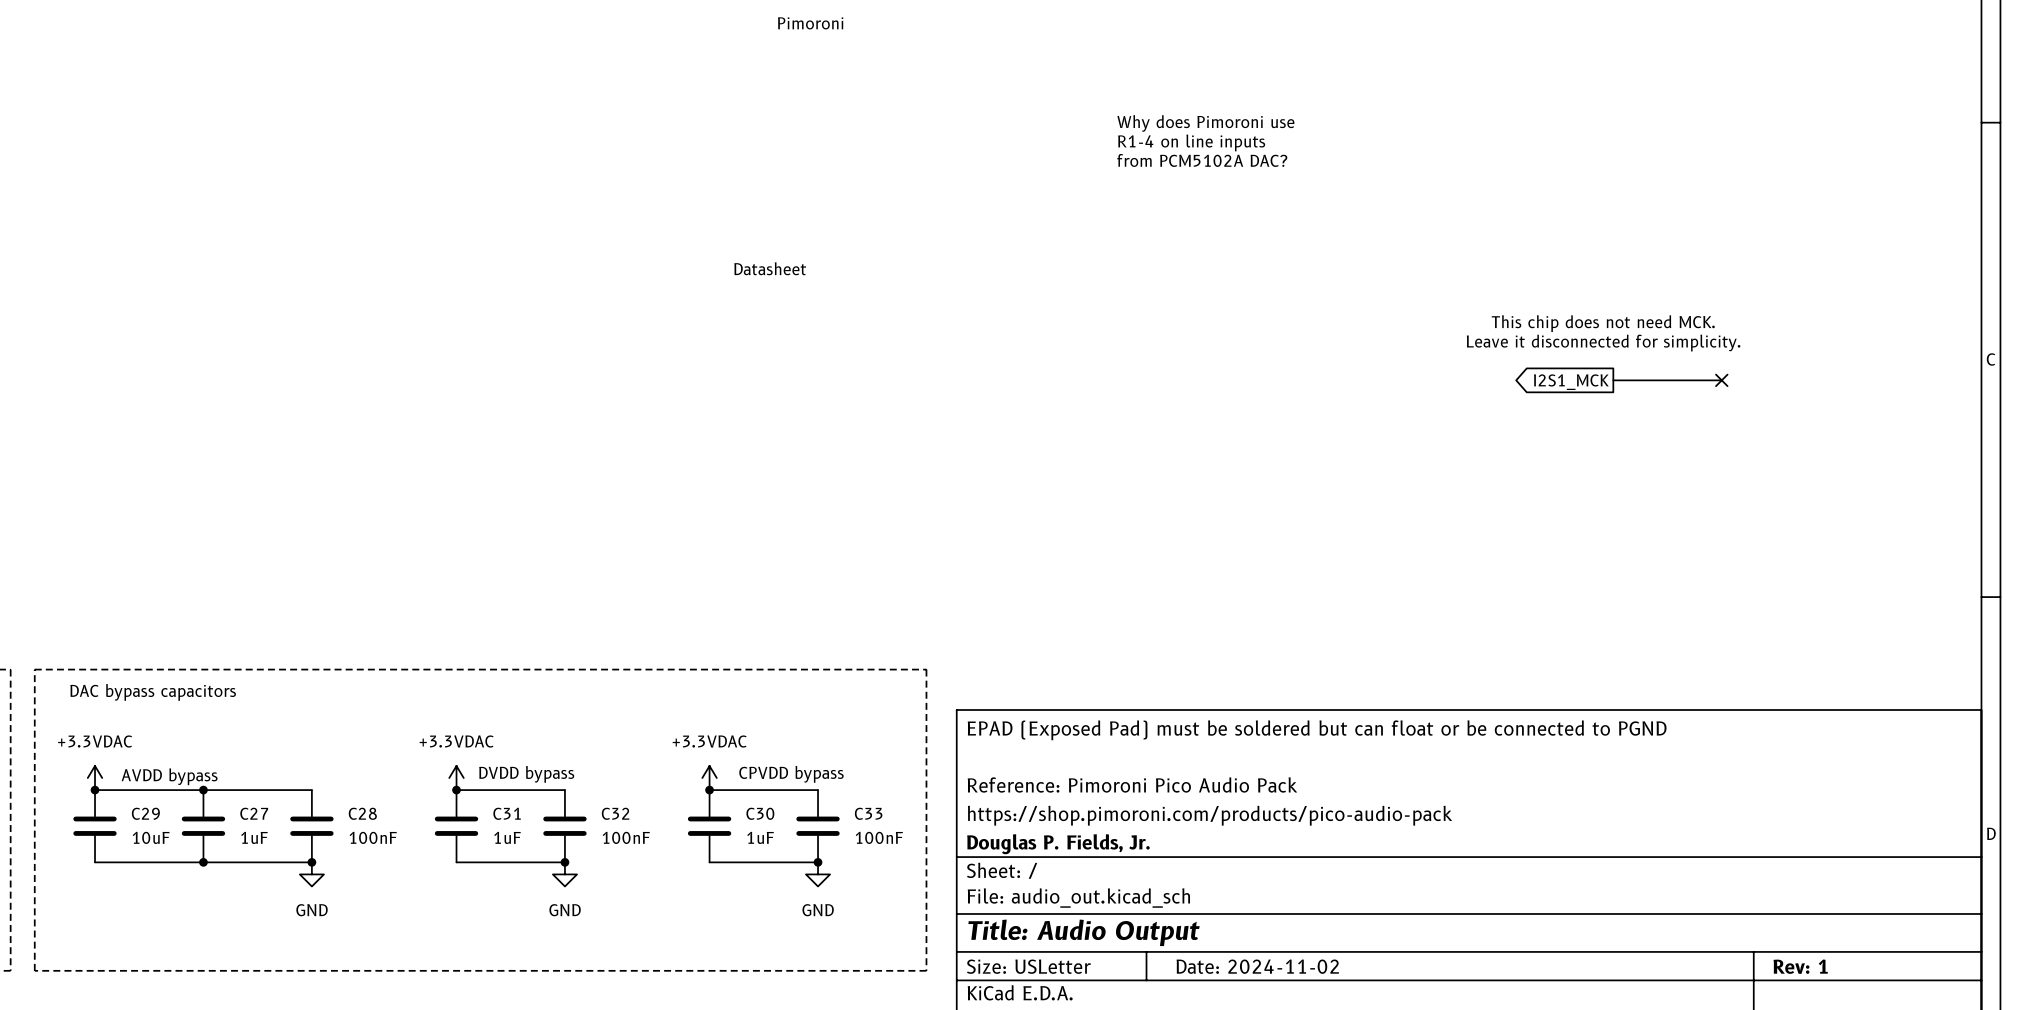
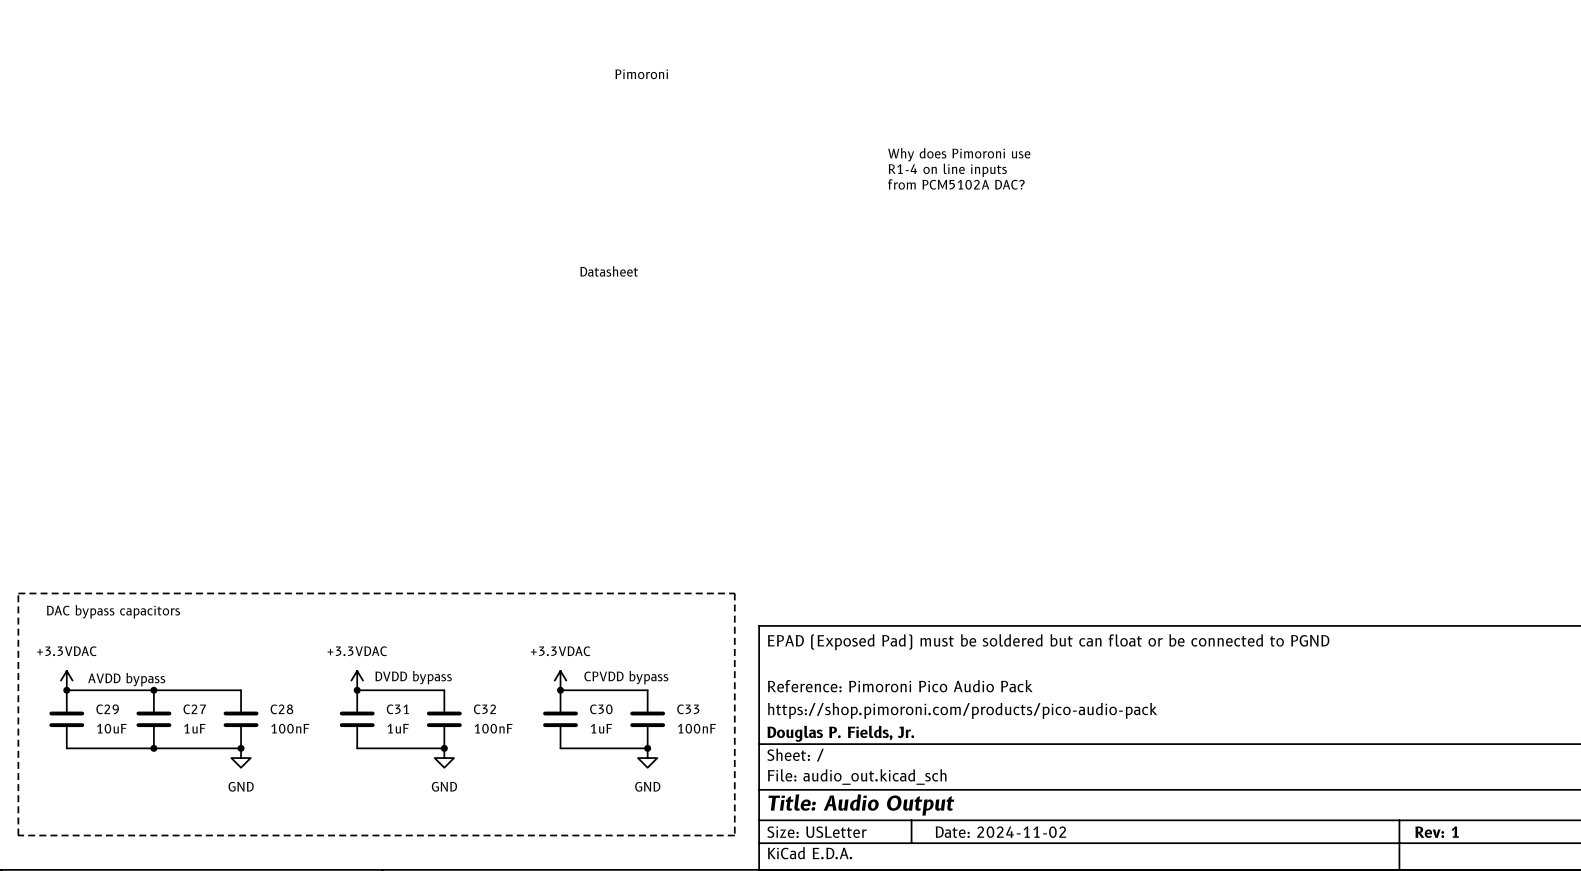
text: This chip does not need MCK. (1603, 323) -> none
text: Leave it disconnected for simplicity. (1603, 343) -> none
wire: (1613, 380) (1721, 380) -> none
no-connect mark: (1721, 380) -> none
global label: I2S1_MCK (1571, 382) -> none

